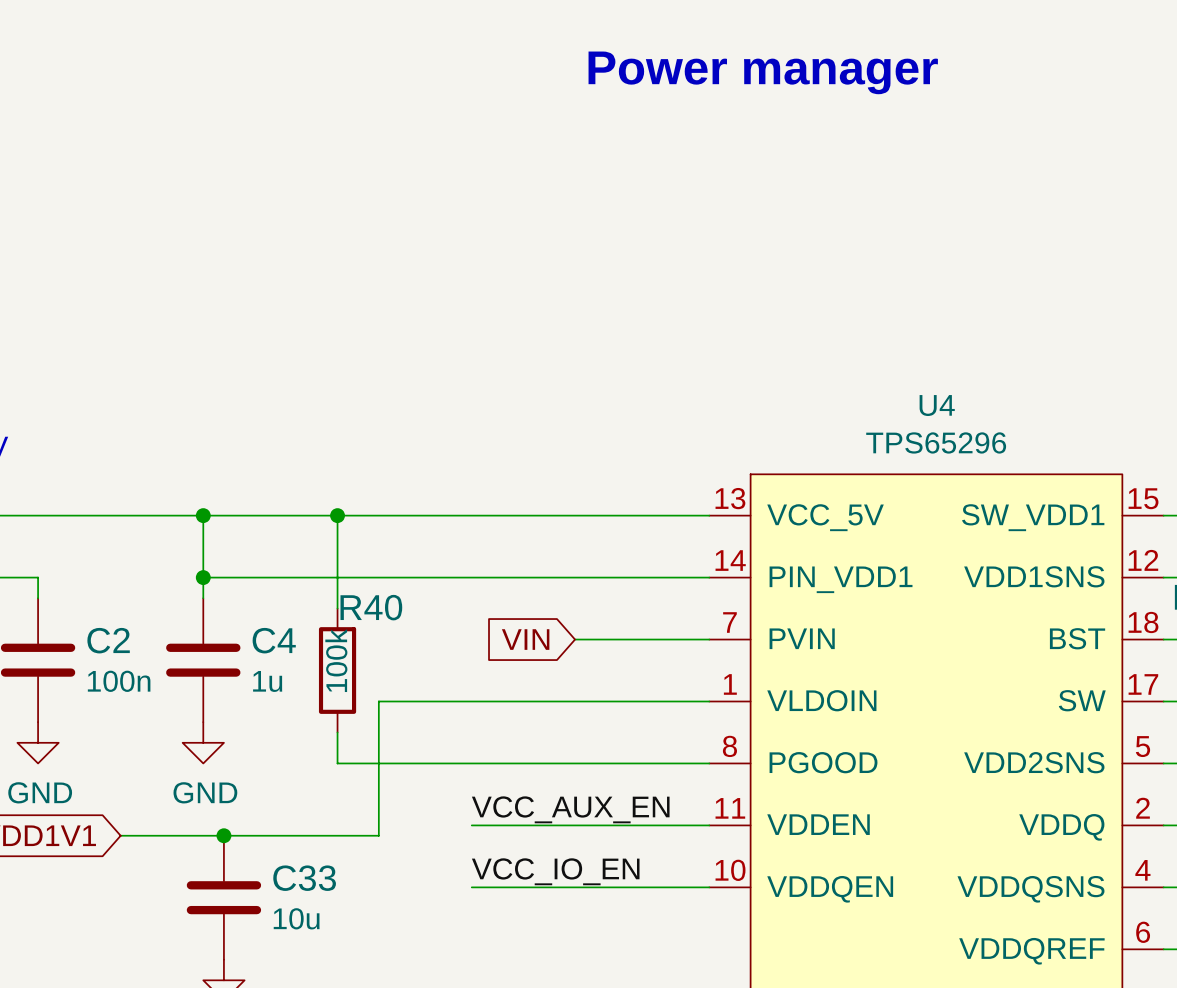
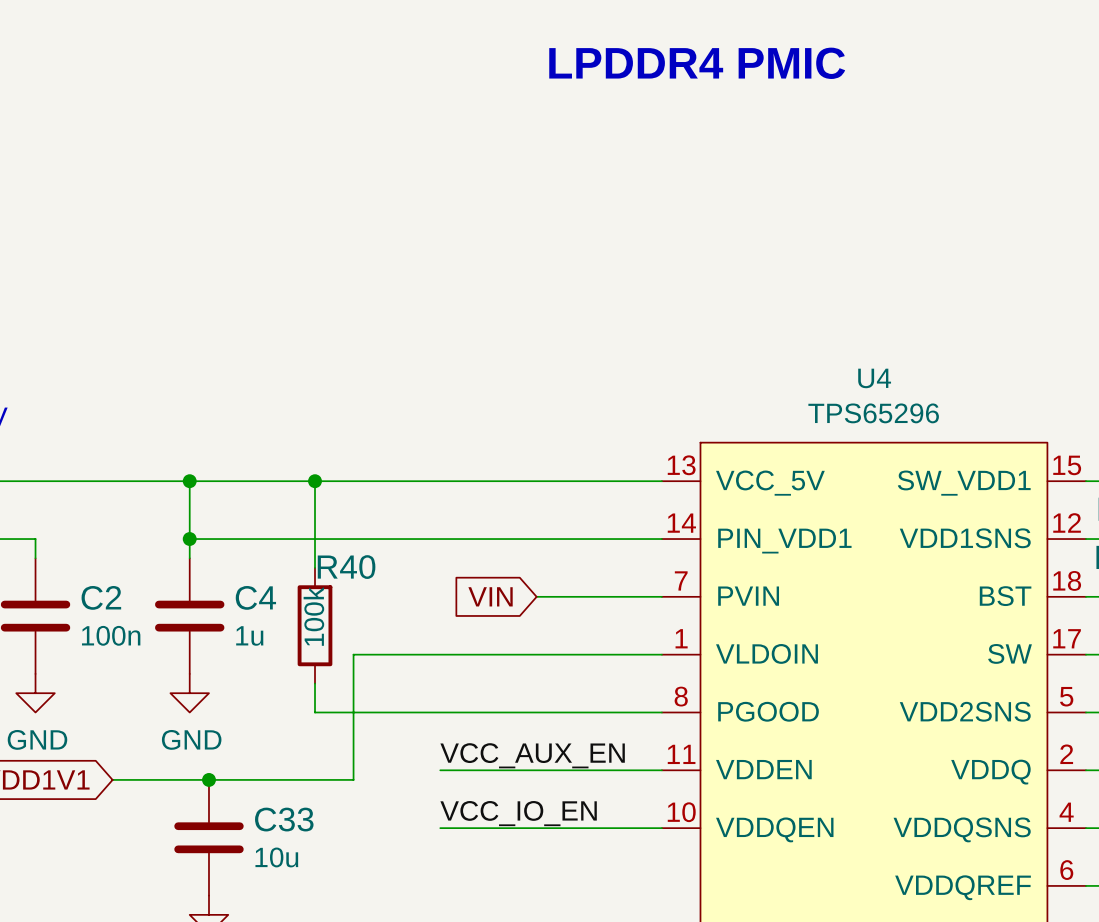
text: Power manager (763, 72) -> LPDDR4 PMIC (697, 63)

